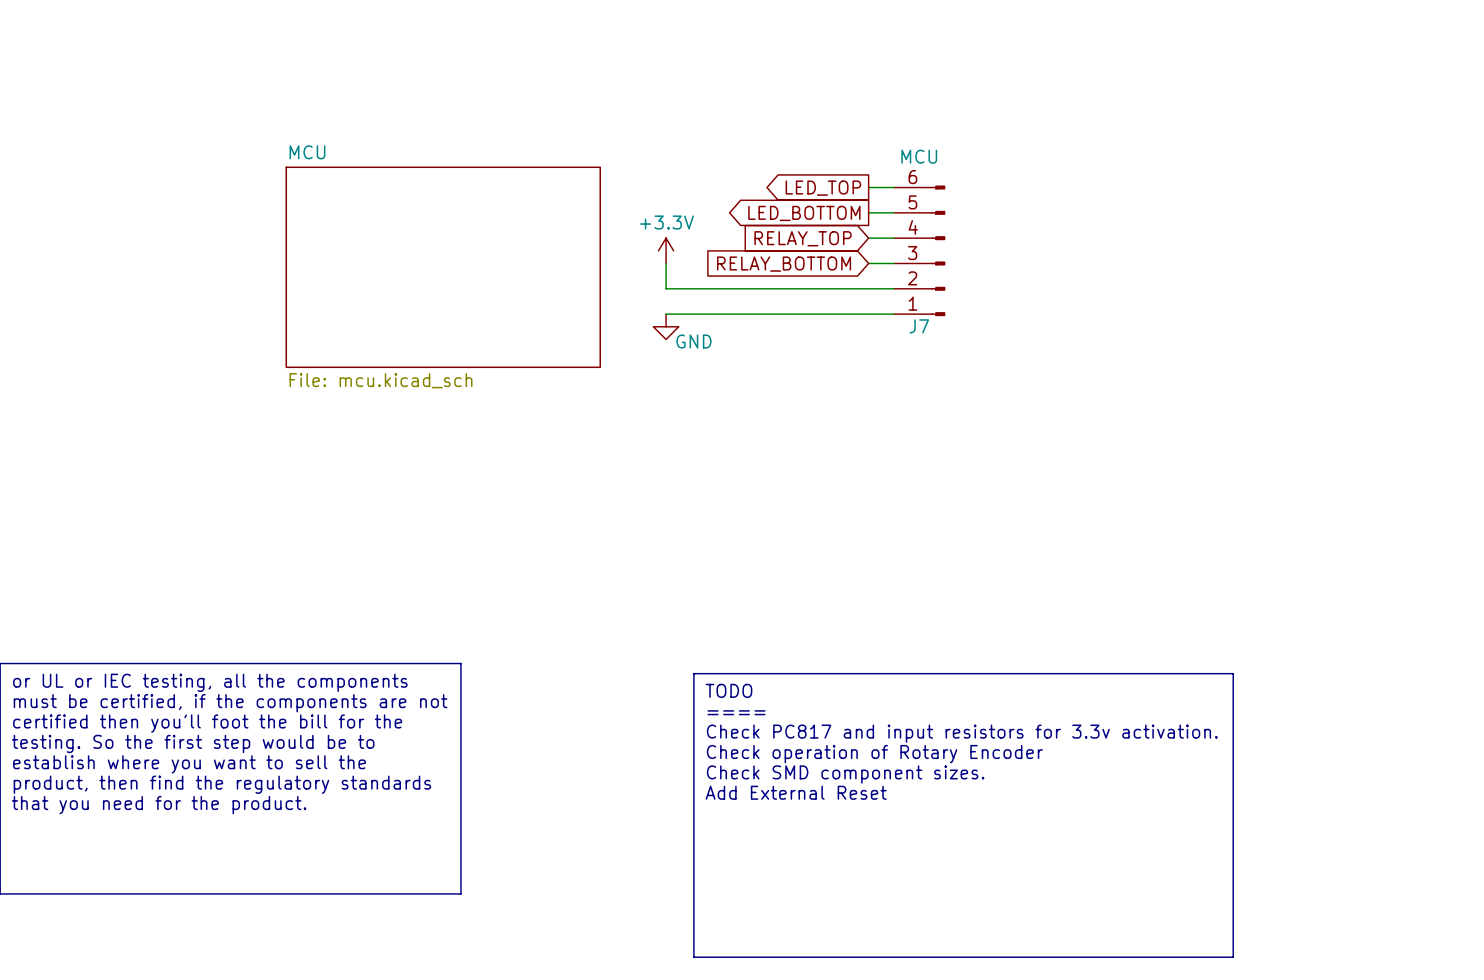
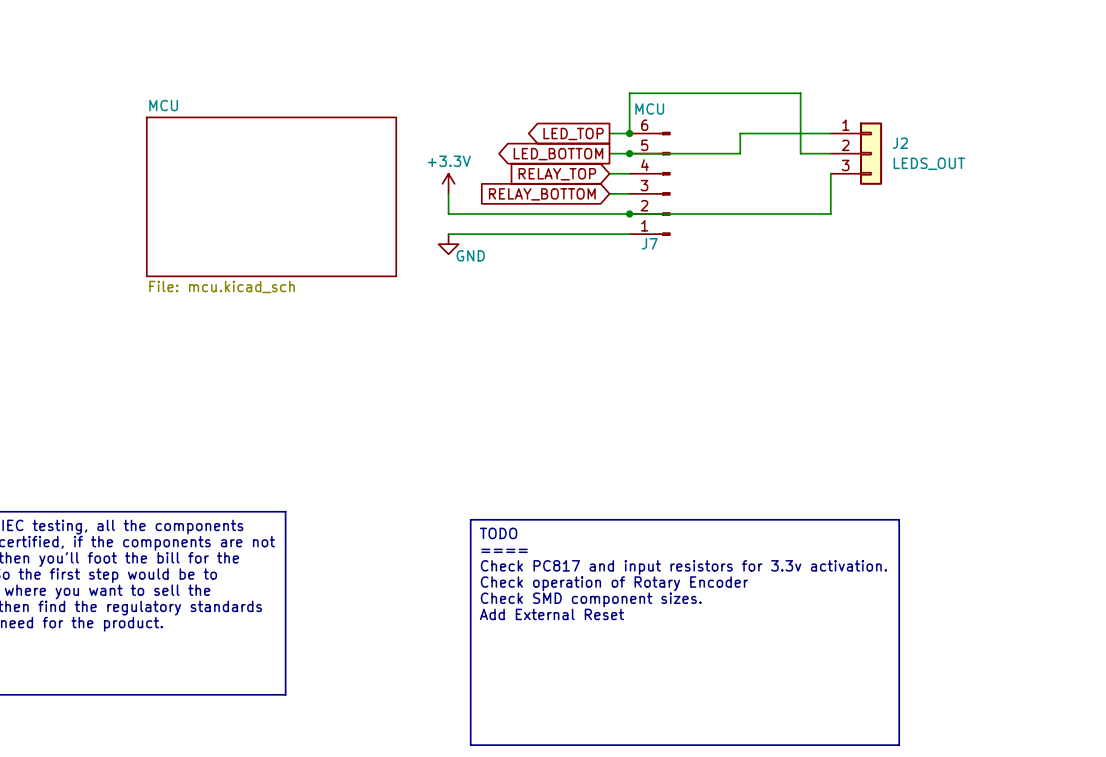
wire: none -> (629, 133) (629, 93) (800, 93) (800, 153) (830, 153)
junction: none -> (629, 133)
wire: none -> (830, 133) (740, 133) (740, 153) (629, 153)
junction: none -> (629, 153)
J2: none -> LEDS_OUT (856, 153)
wire: none -> (830, 173) (830, 214) (629, 214)
junction: none -> (629, 214)

